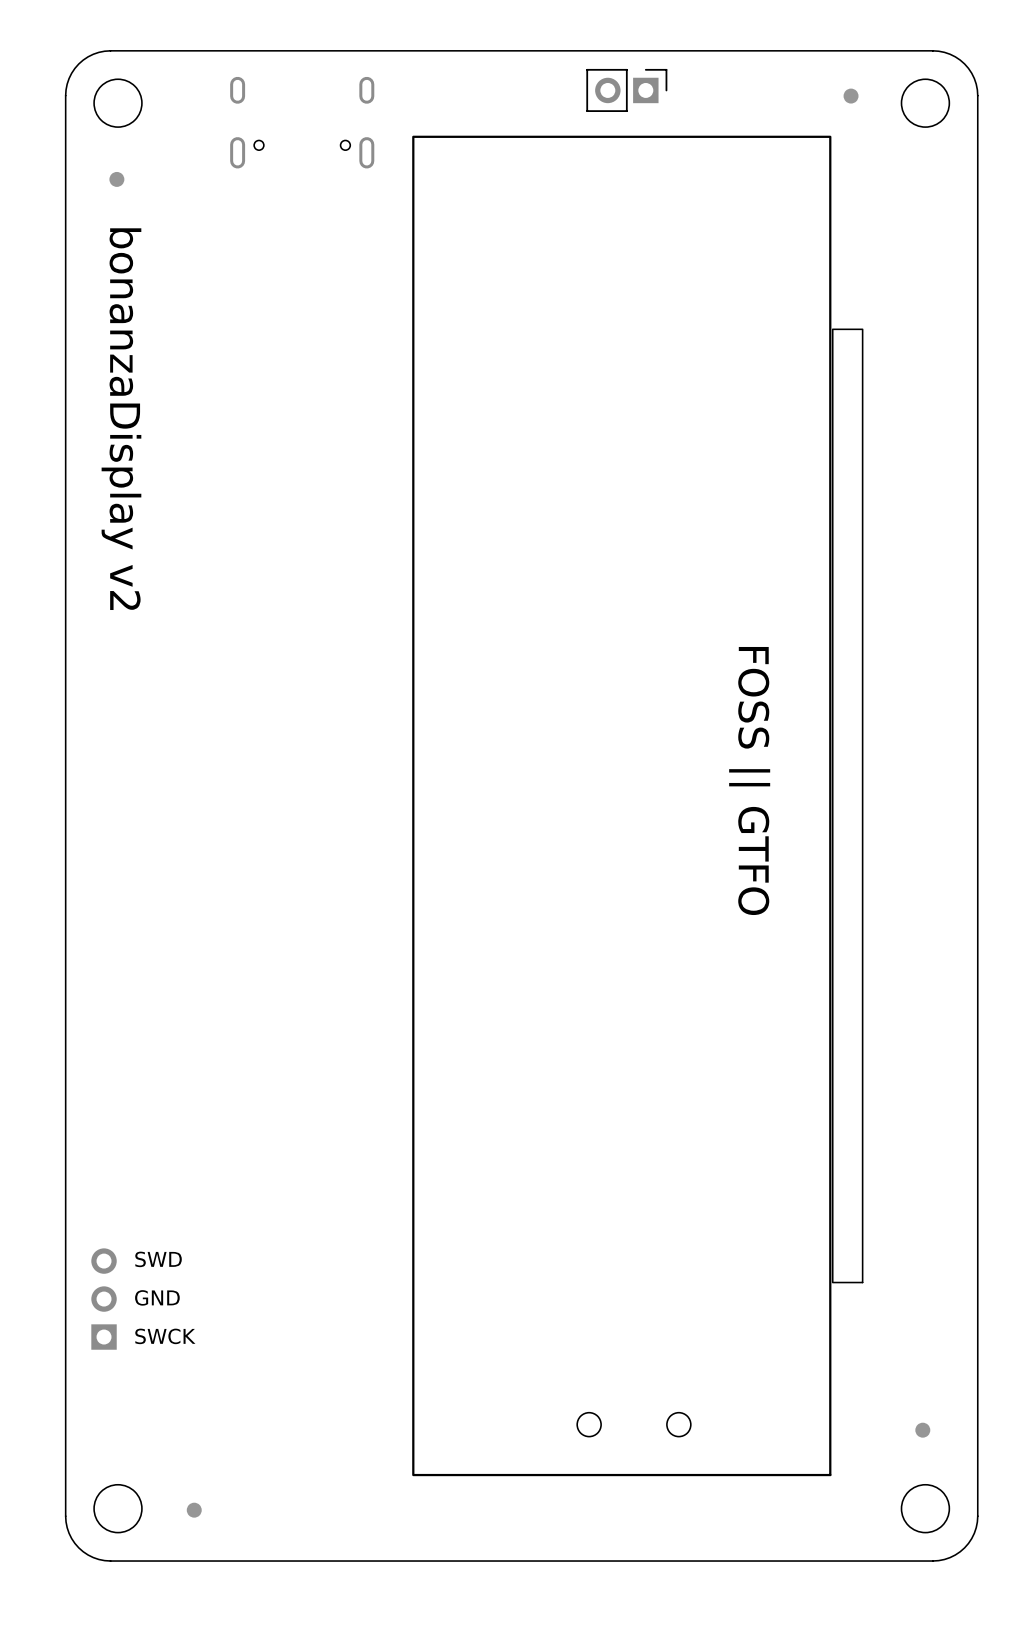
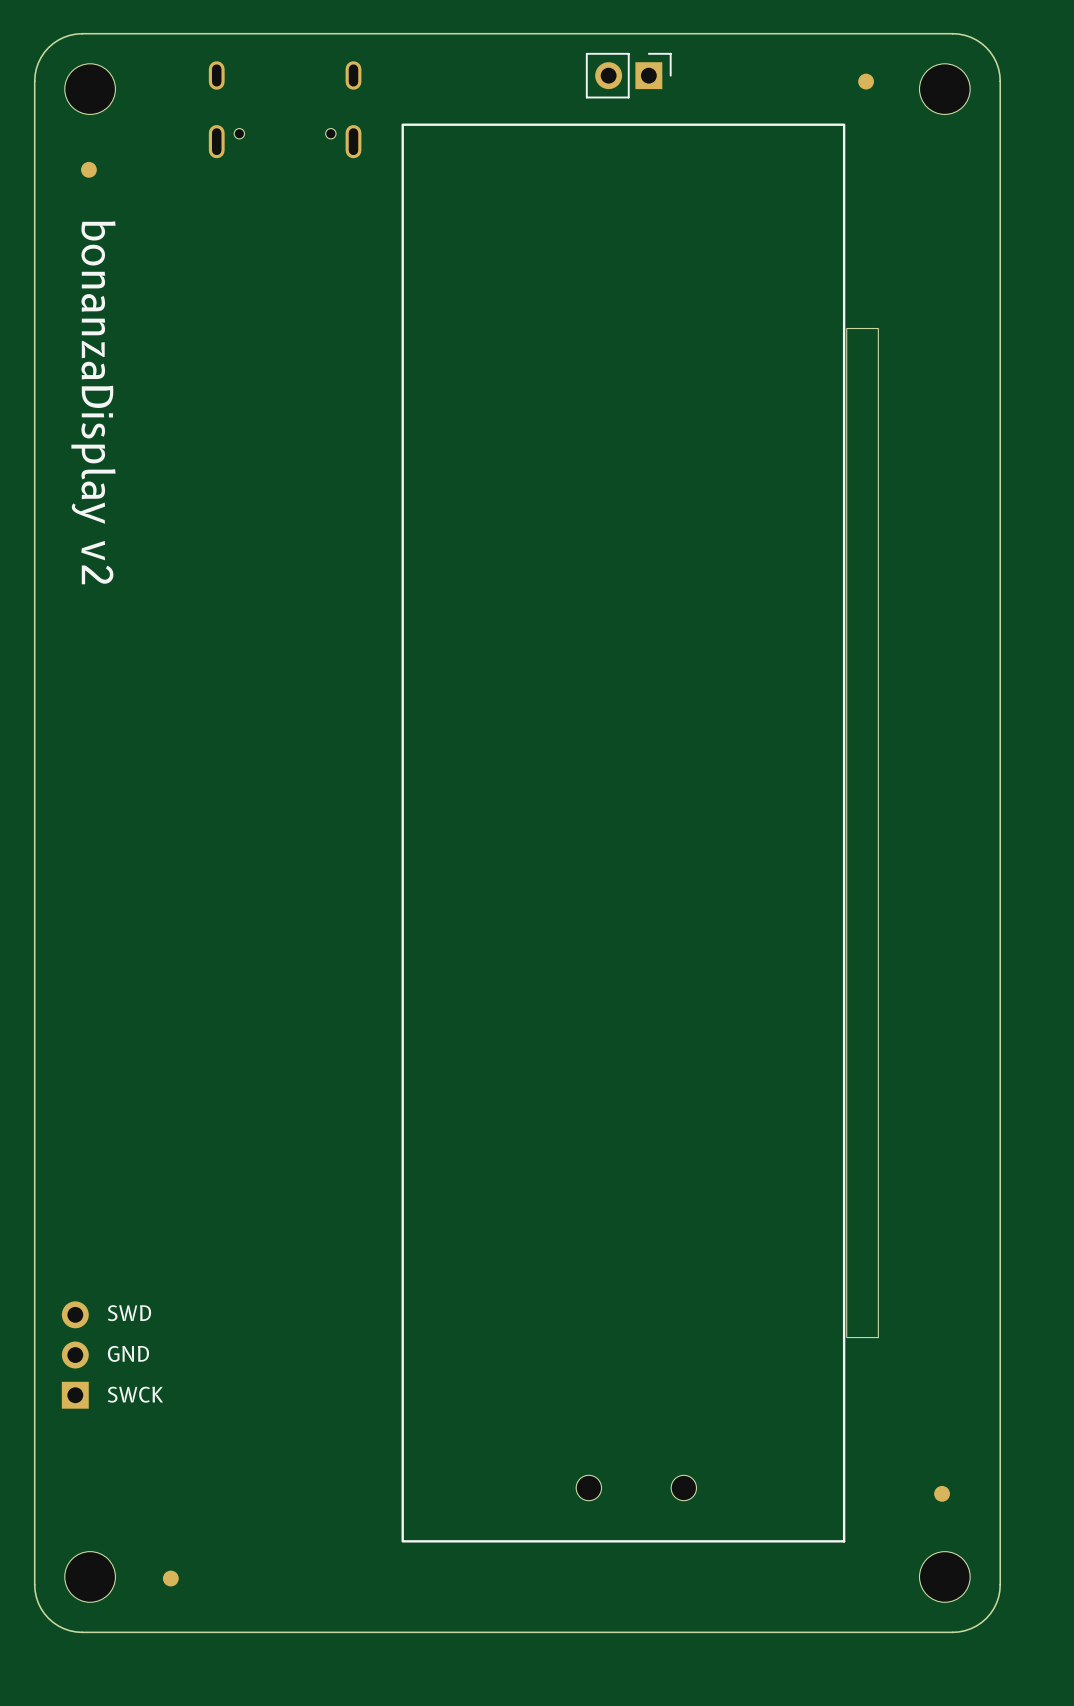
text: FOSS || GTFO (749, 781) -> none

